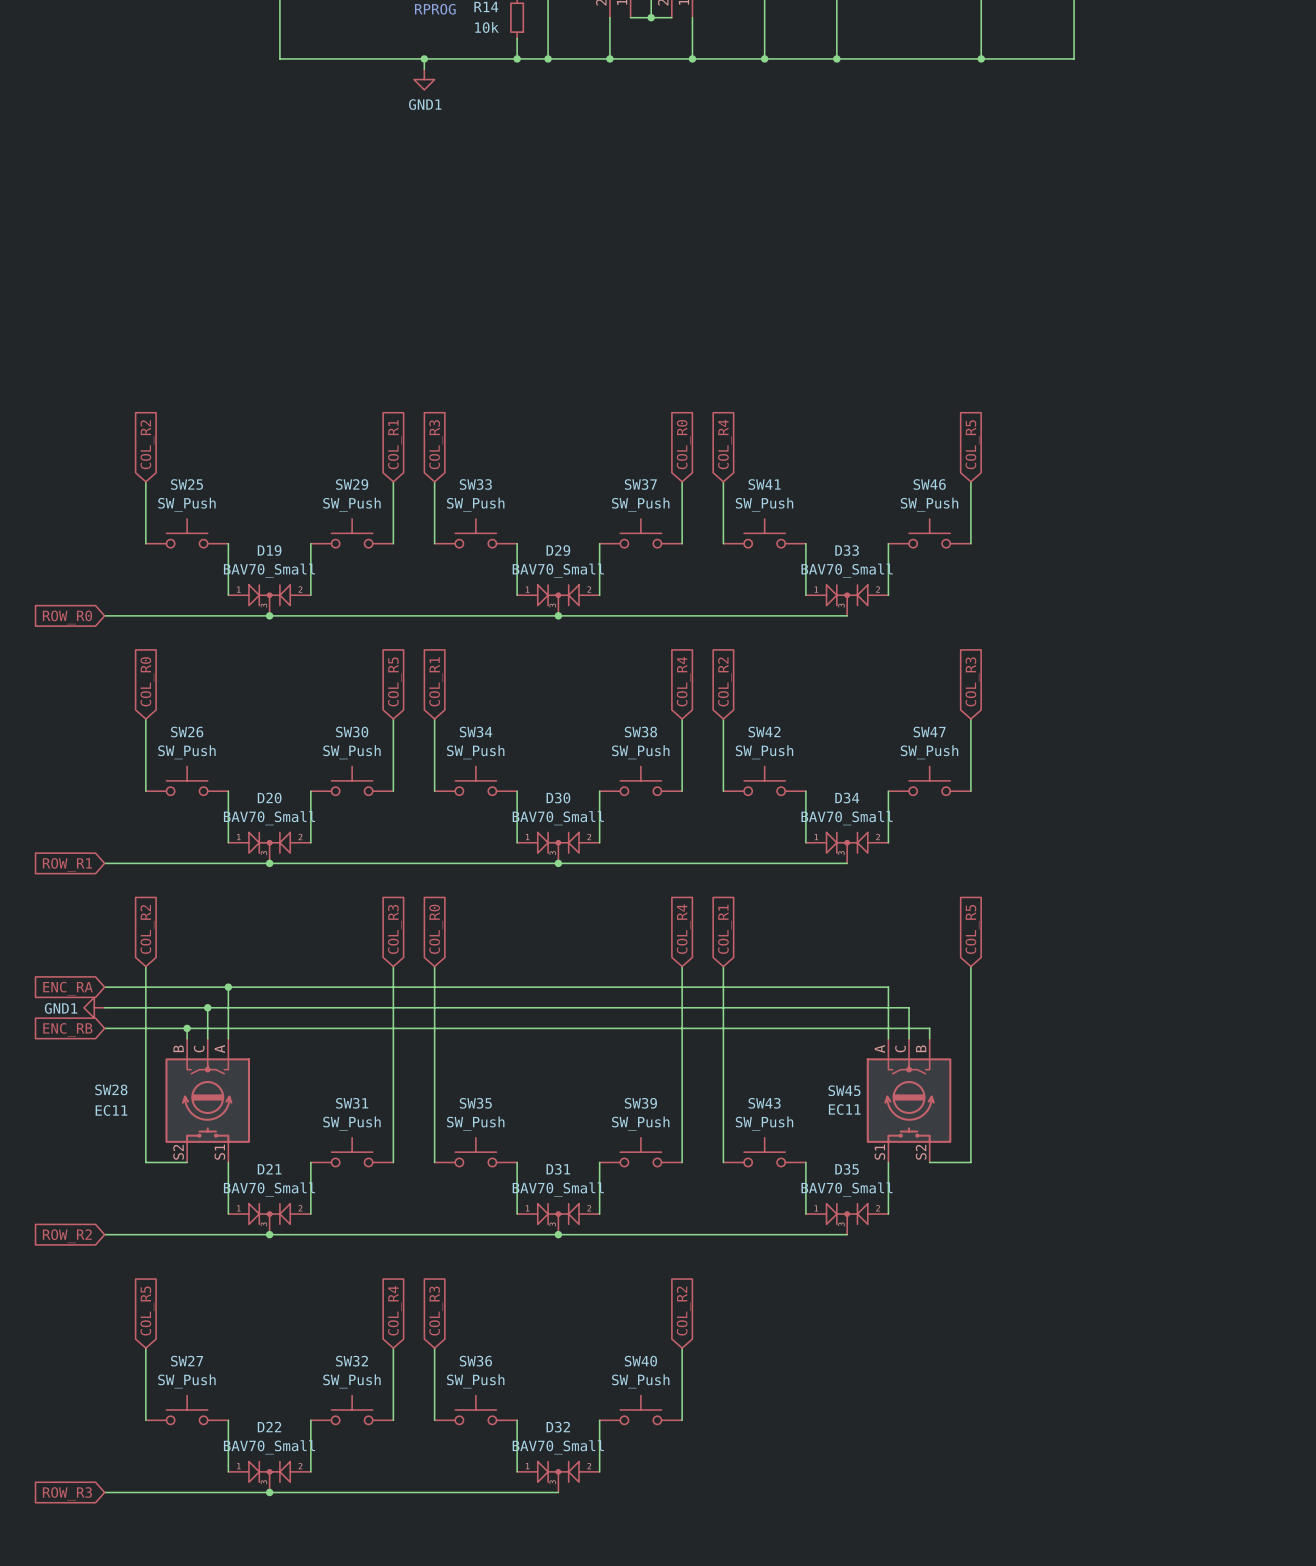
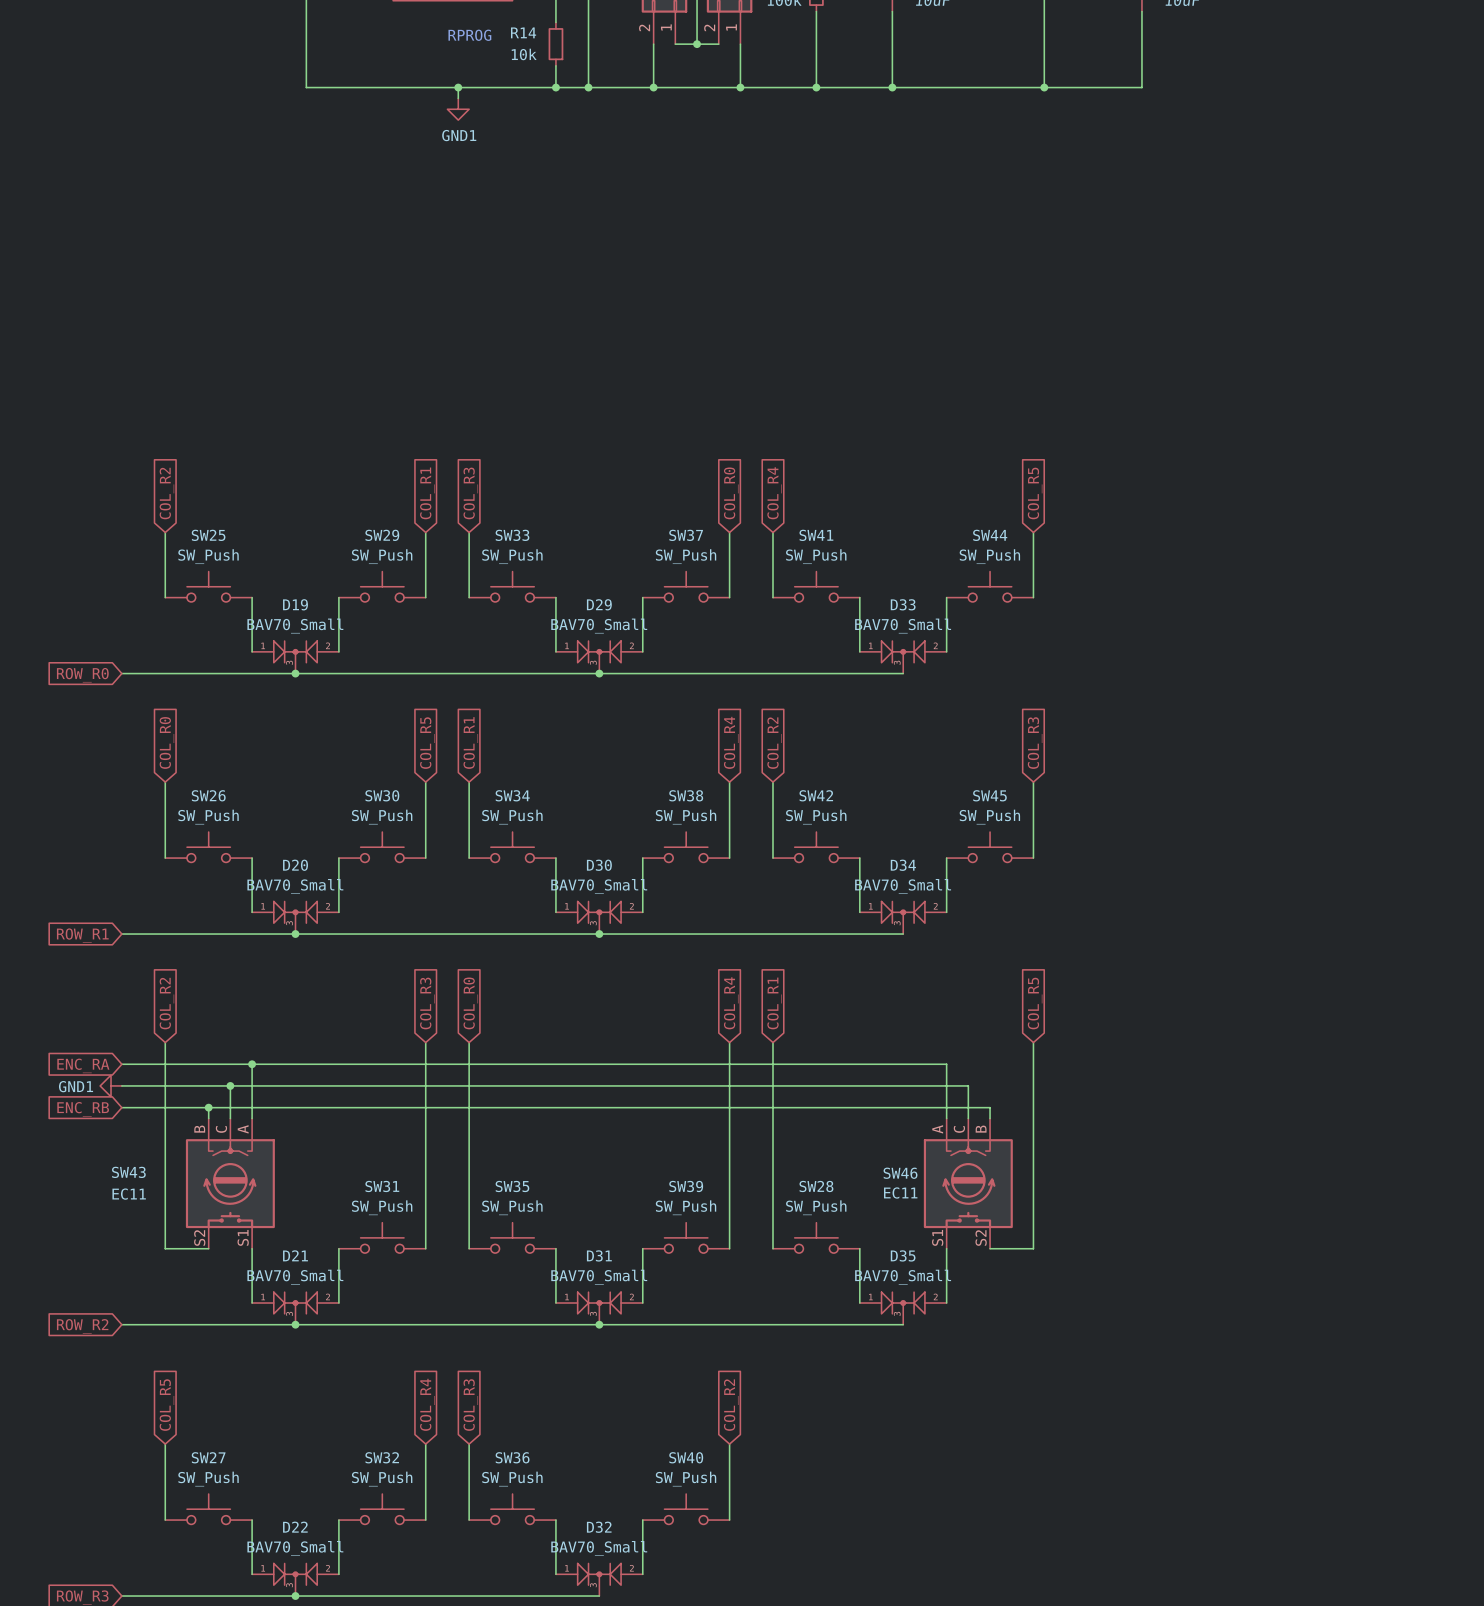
SW46 name: SW46 (929, 484) -> SW44 (990, 535)
SW47 name: SW47 (929, 732) -> SW45 (989, 795)
SW28 name: SW28 (111, 1089) -> SW43 (128, 1172)
SW45 name: SW45 (844, 1090) -> SW46 (900, 1173)
SW43 name: SW43 (764, 1103) -> SW28 (816, 1186)

